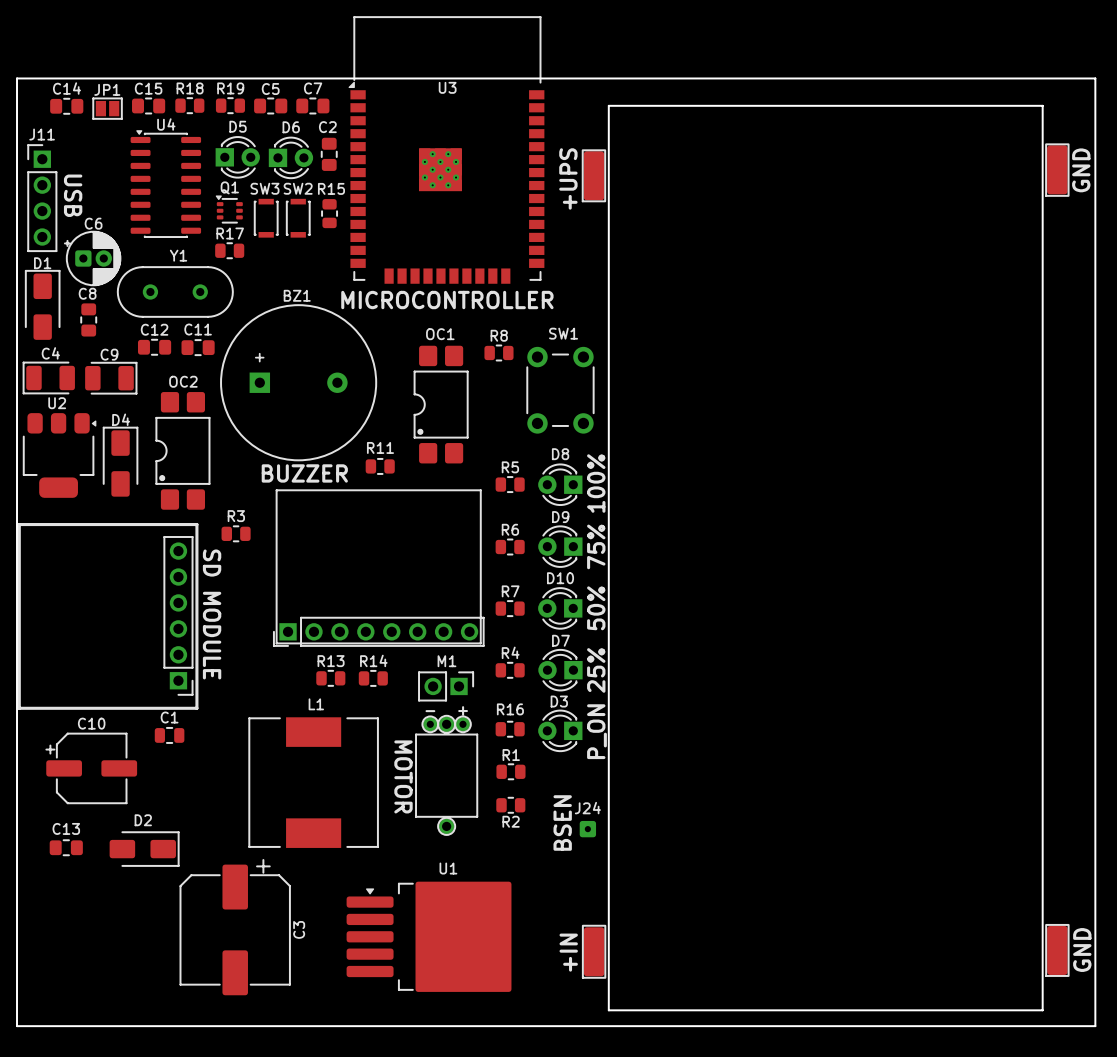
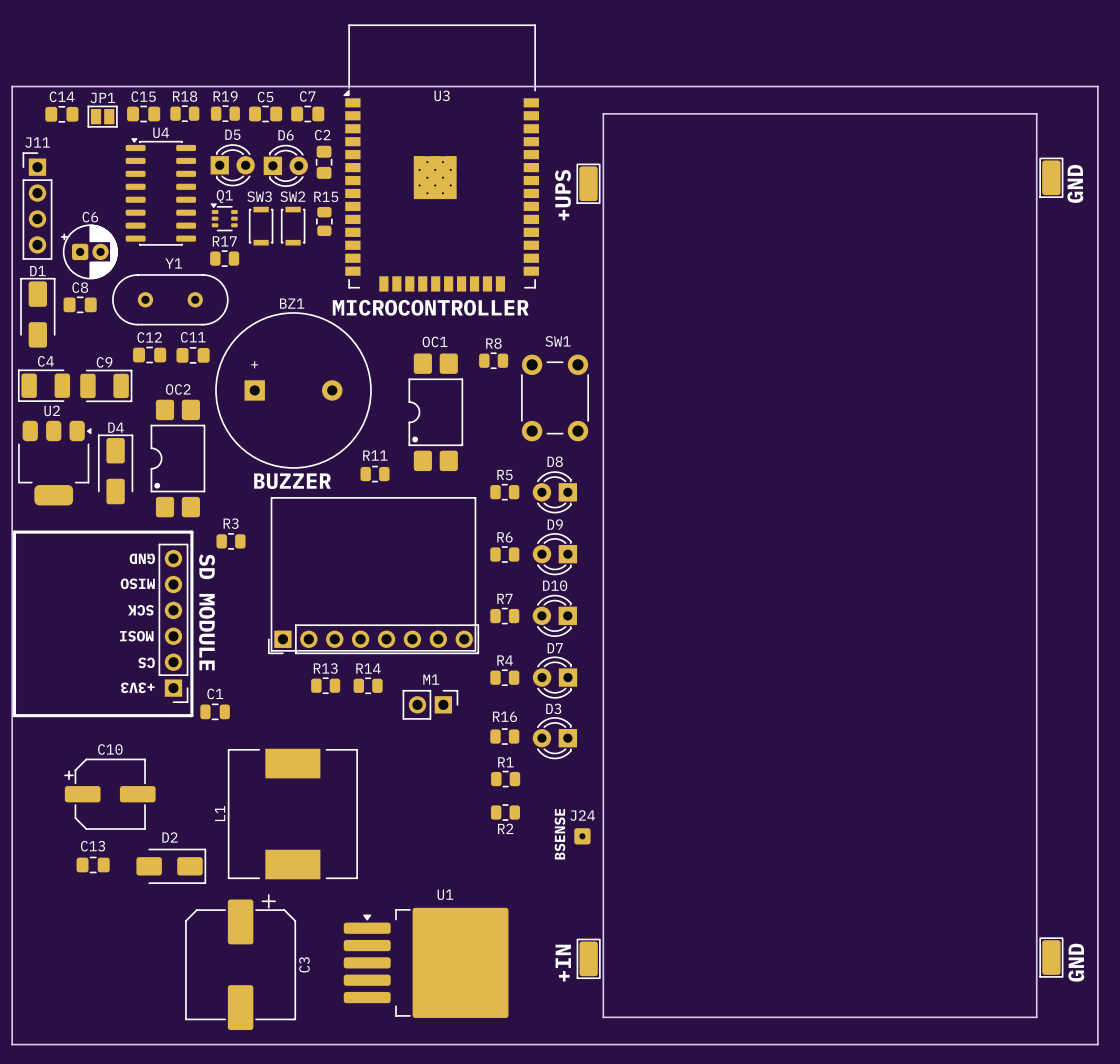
board edge: (1095, 78) (1095, 1026) (17, 1026) -> (1089, 86) (1097, 86) (1097, 1044) (12, 1044) (12, 1033)
part footprint: [1045, 143, 1070, 197] -> [1039, 157, 1064, 198]
part footprint: [582, 149, 606, 202] -> [576, 163, 601, 204]
text: USB (73, 195) -> none
C6 position: (92, 258) -> (89, 251)
C8 rotation: 0° (88, 319) -> 90° clockwise (80, 304)
C8 position: (88, 319) -> (80, 304)
text: 100% (596, 483) -> none
text: 75% (596, 546) -> none
text: none -> GND (142, 558)
text: none -> MISO (137, 583)
text: none -> SCK (140, 610)
text: 50% (596, 608) -> none
text: none -> MOSI (136, 636)
text: none -> CS (146, 662)
text: 25% (596, 670) -> none
text: none -> +3V3 (137, 687)
M1 position: (446, 686) -> (430, 704)
L1 name rotation: 0° (316, 704) -> 90° counterclockwise (220, 813)
L1 name position: L1 (316, 704) -> L1 (220, 813)
text: - (430, 711) -> none
text: + (463, 711) -> none
drawing: [421, 715, 472, 734] -> none
via: (430, 724) -> none
via: (446, 724) -> none
via: (462, 724) -> none
text: P_ON (596, 731) -> none
C10 footprint: [45, 733, 138, 804] -> [64, 758, 156, 830]
line: (416, 734) (477, 734) (477, 816) (416, 816) (416, 734) -> none
C1 position: (169, 735) -> (215, 711)
text: MOTOR (403, 776) -> none
L1 position: (313, 782) -> (292, 814)
drawing: [437, 817, 456, 836] -> none
text: BSEN (562, 822) -> BSENSE (559, 834)
via: (446, 826) -> none
C13 position: (66, 847) -> (93, 864)
D2 position: (144, 849) -> (171, 866)
part footprint: [1045, 924, 1070, 977] -> [1039, 937, 1064, 978]
part footprint: [582, 925, 606, 979] -> [576, 938, 601, 979]
C3 position: (235, 927) -> (240, 962)
U1 position: (429, 936) -> (426, 962)

